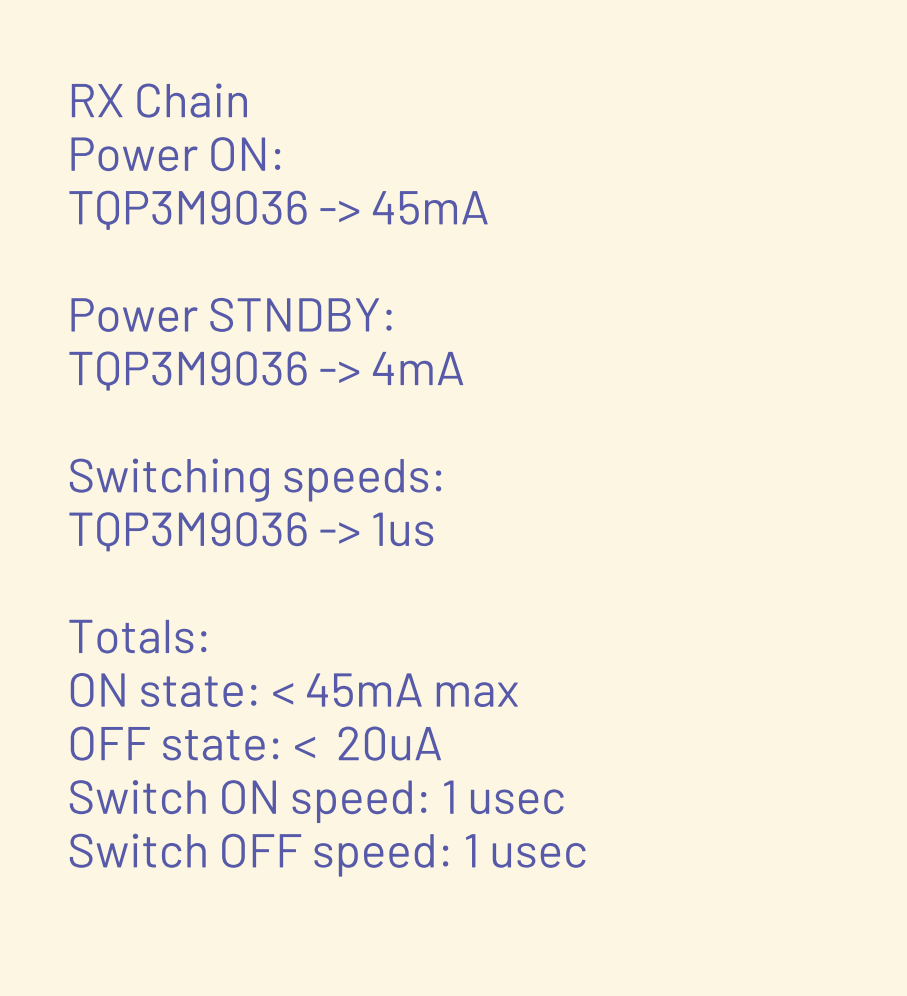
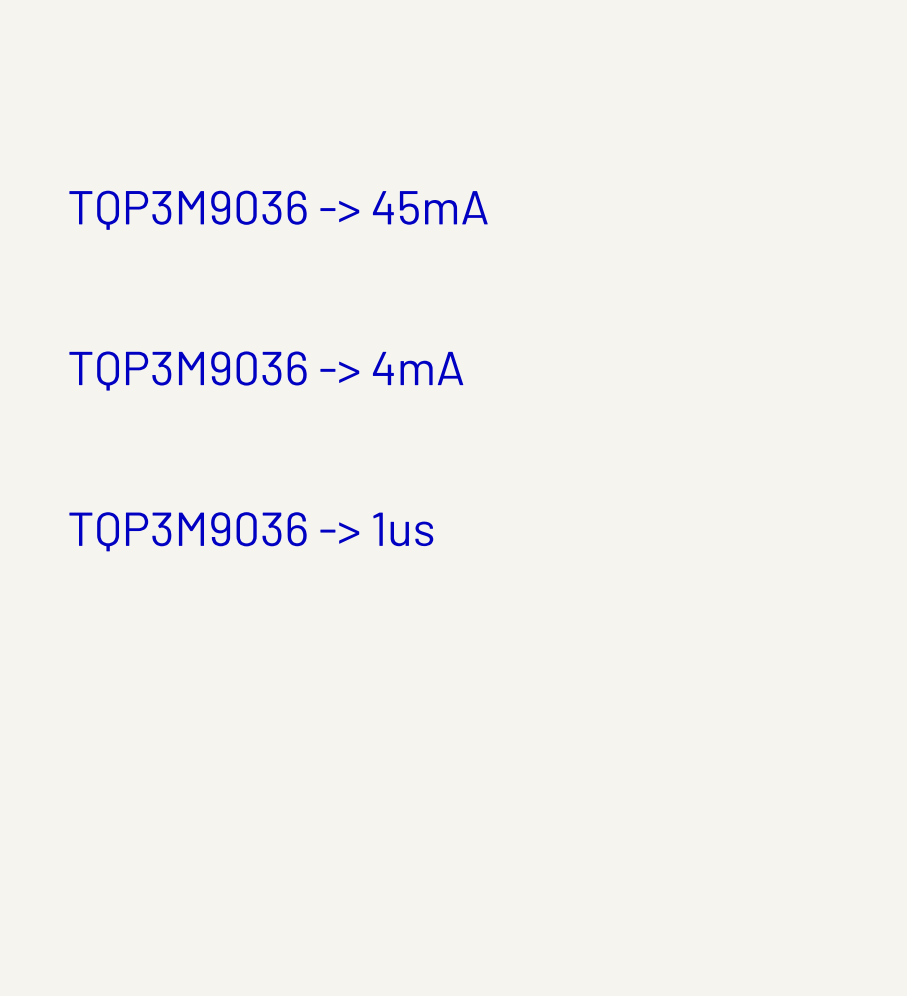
text: RX Chain (159, 100) -> none
text: Power ON: (175, 154) -> none
text: Power STNDBY: (231, 314) -> none
text: Switching speeds: (255, 480) -> none
text: Totals: (137, 636) -> none
text: ON state: < 45mA max (294, 690) -> none
text: OFF state: < 20uA (255, 743) -> none
text: Switch ON speed: 1 usec (316, 801) -> none
text: Switch OFF speed: 1 usec (327, 855) -> none

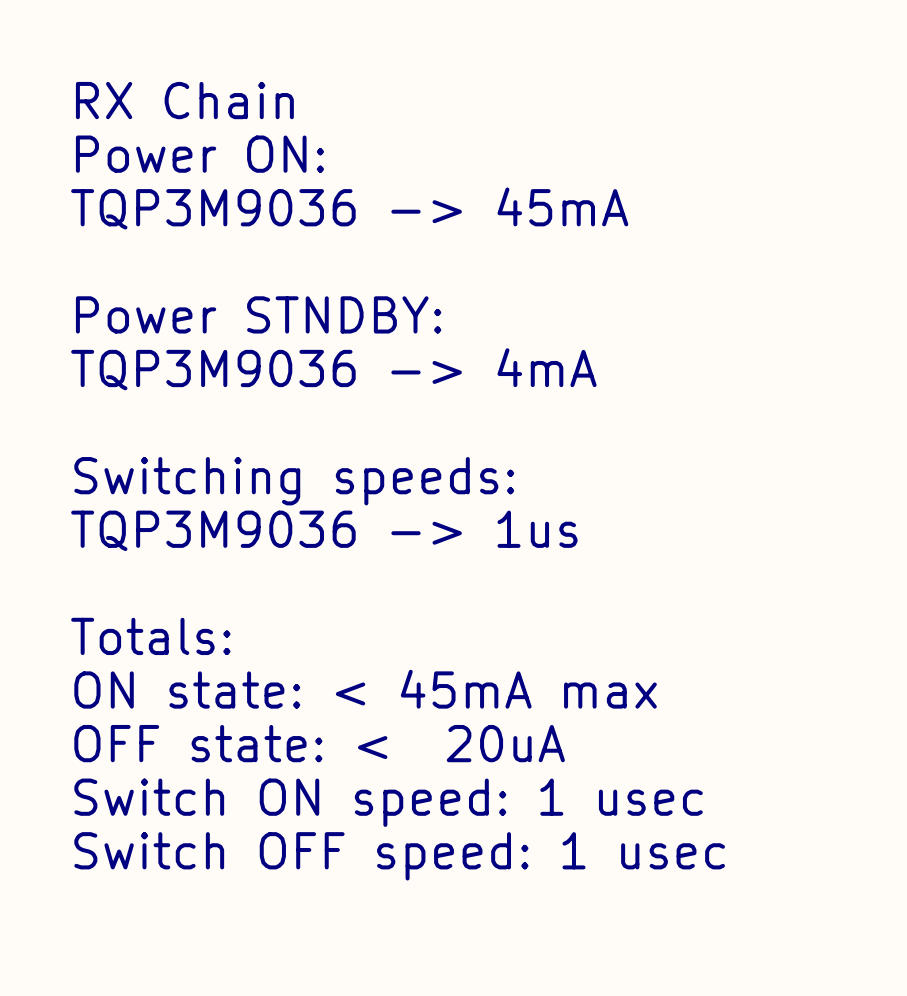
text: none -> RX Chain (184, 100)
text: none -> Power ON: (199, 154)
text: none -> Power STNDBY: (258, 314)
text: none -> Switching speeds: (294, 481)
text: none -> Totals: (150, 636)
text: none -> ON state: < 45mA max (365, 689)
text: none -> OFF state: < 20uA (319, 743)
text: none -> Switch ON speed: 1 usec (388, 802)
text: none -> Switch OFF speed: 1 usec (399, 856)

